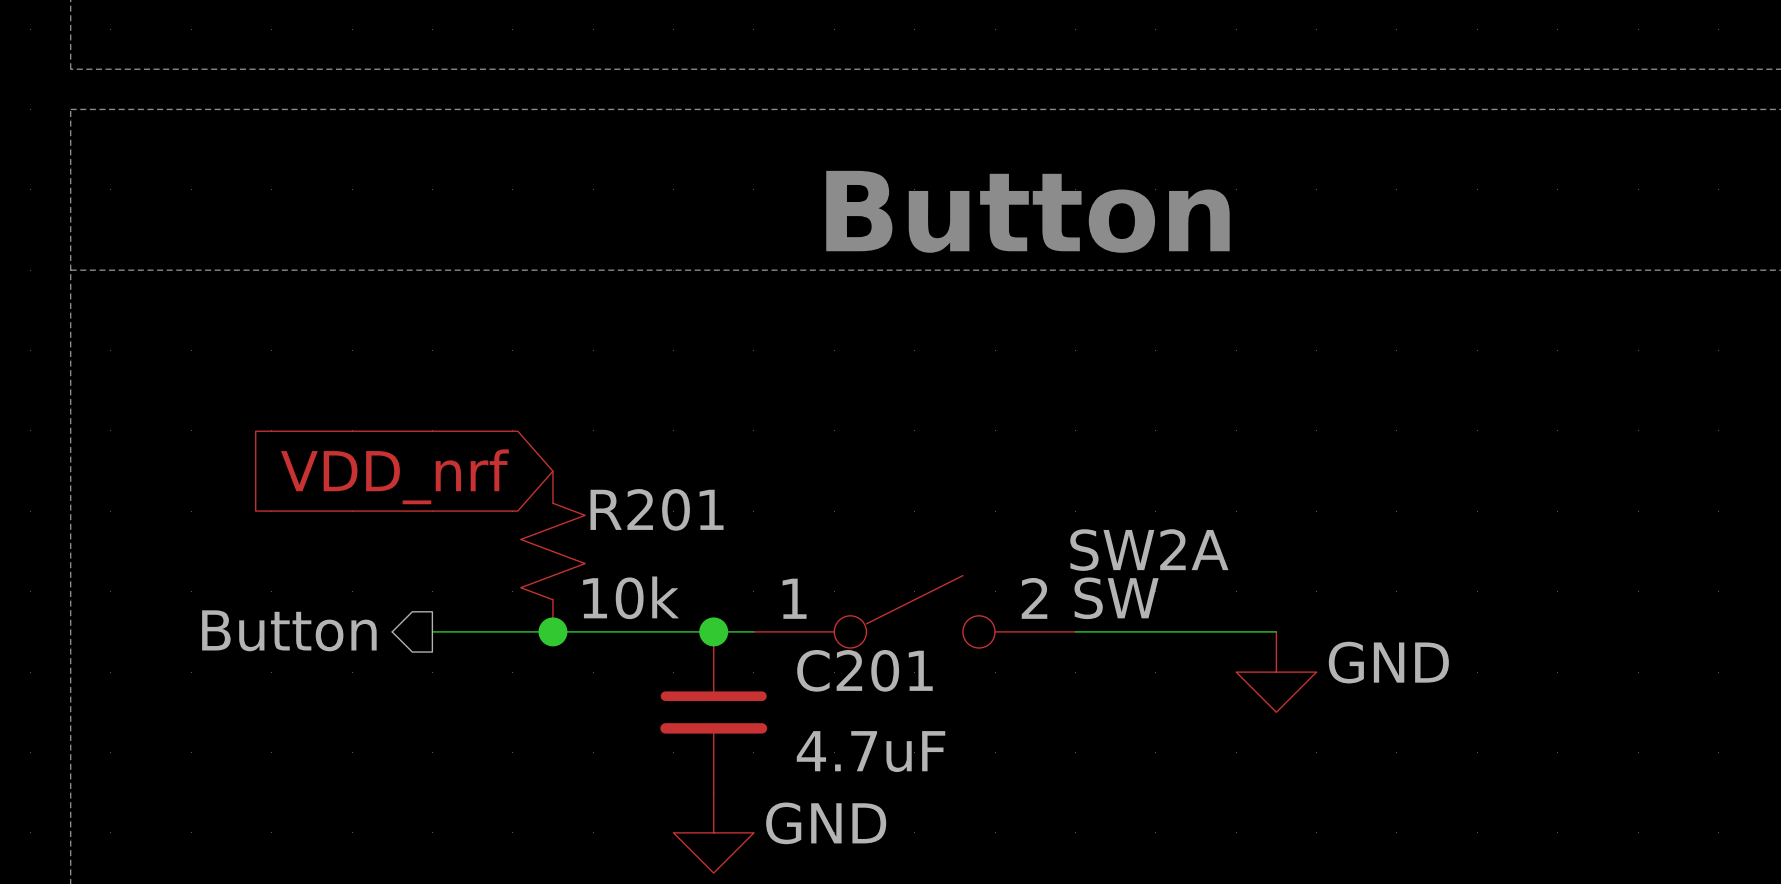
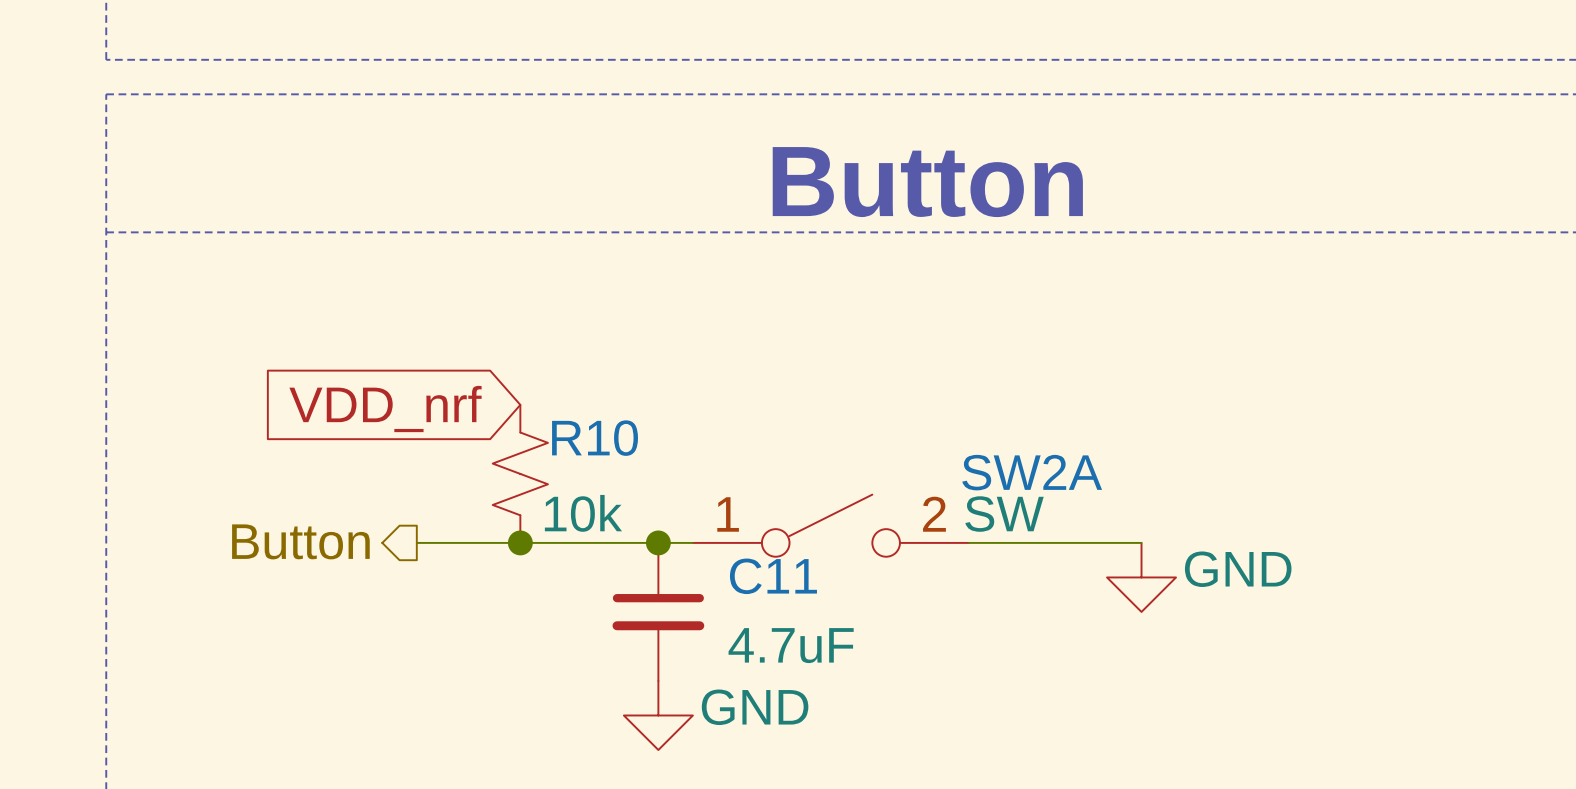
R201 name: R201 (657, 509) -> R10 (595, 438)
C201 name: C201 (864, 670) -> C11 (773, 576)

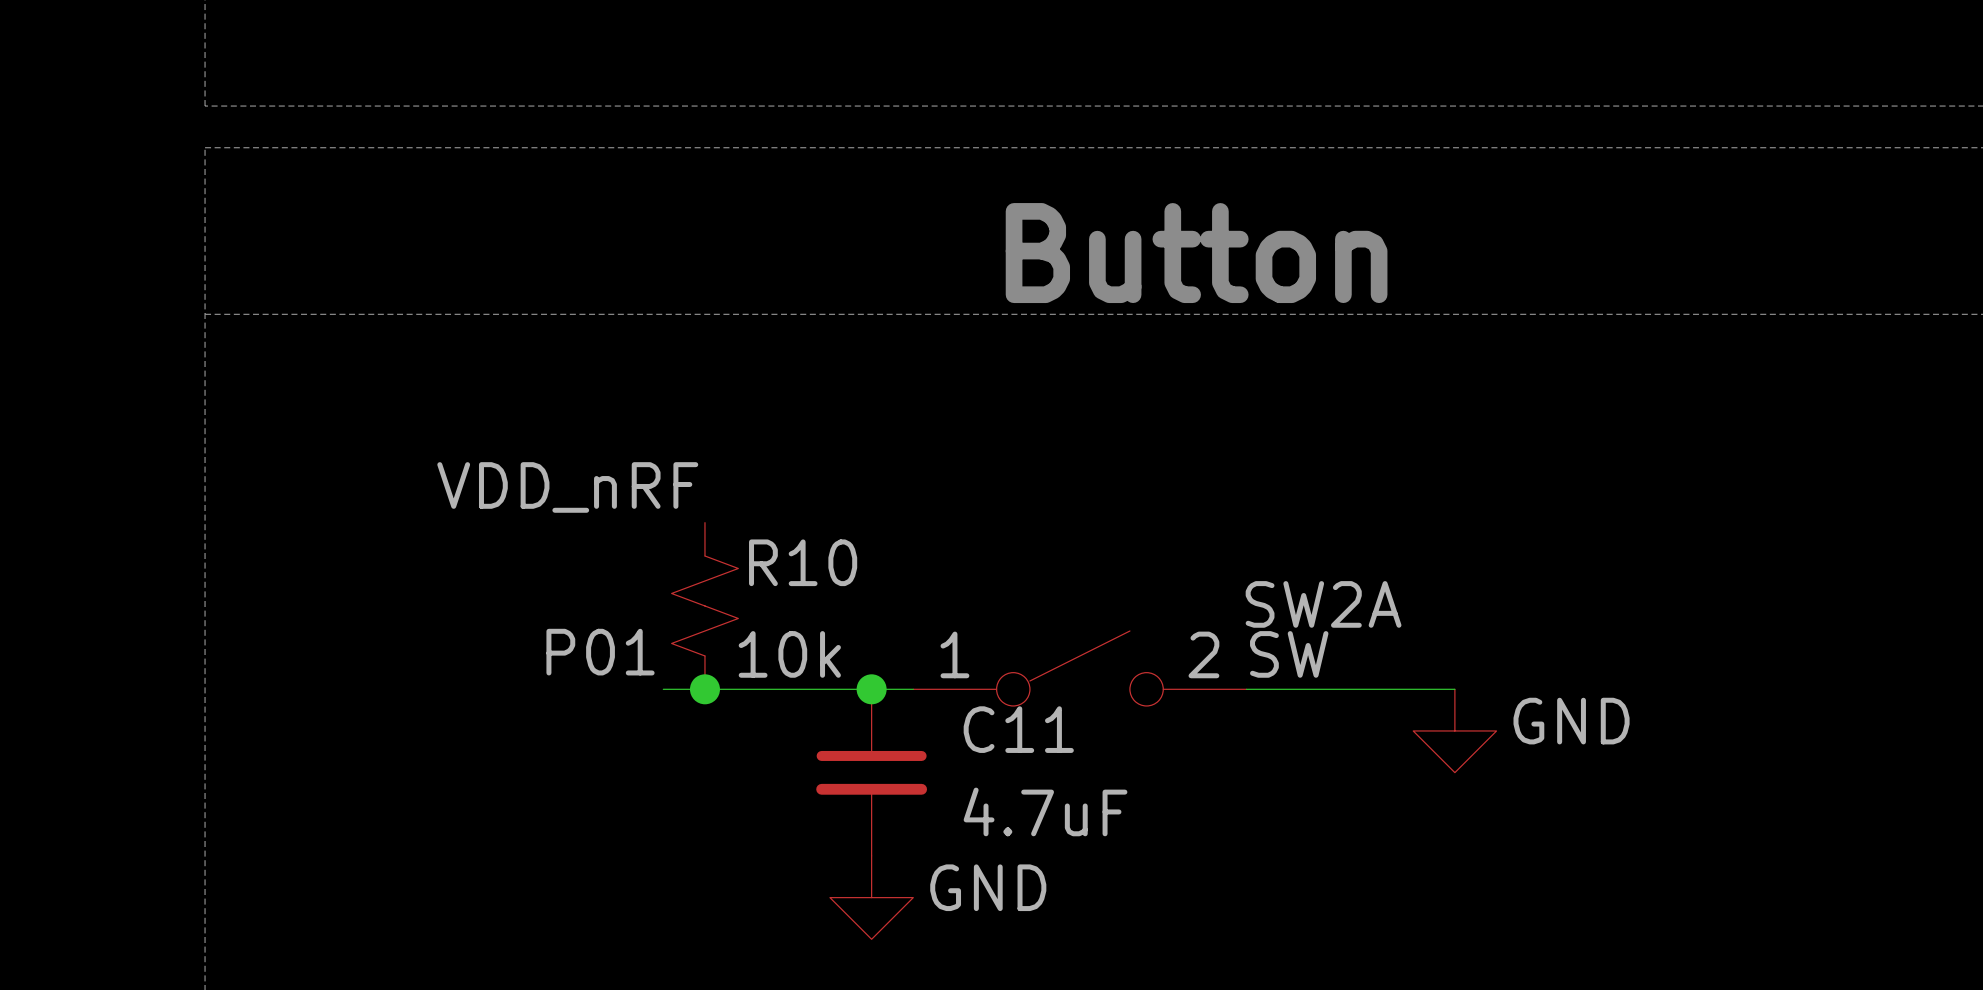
label: none -> VDD_nRF (567, 487)
global label: VDD_nrf (385, 408) -> none
label: none -> P01 (600, 652)
hierarchical label: Button (300, 541) -> none
wire: (416, 542) (485, 542) -> none

